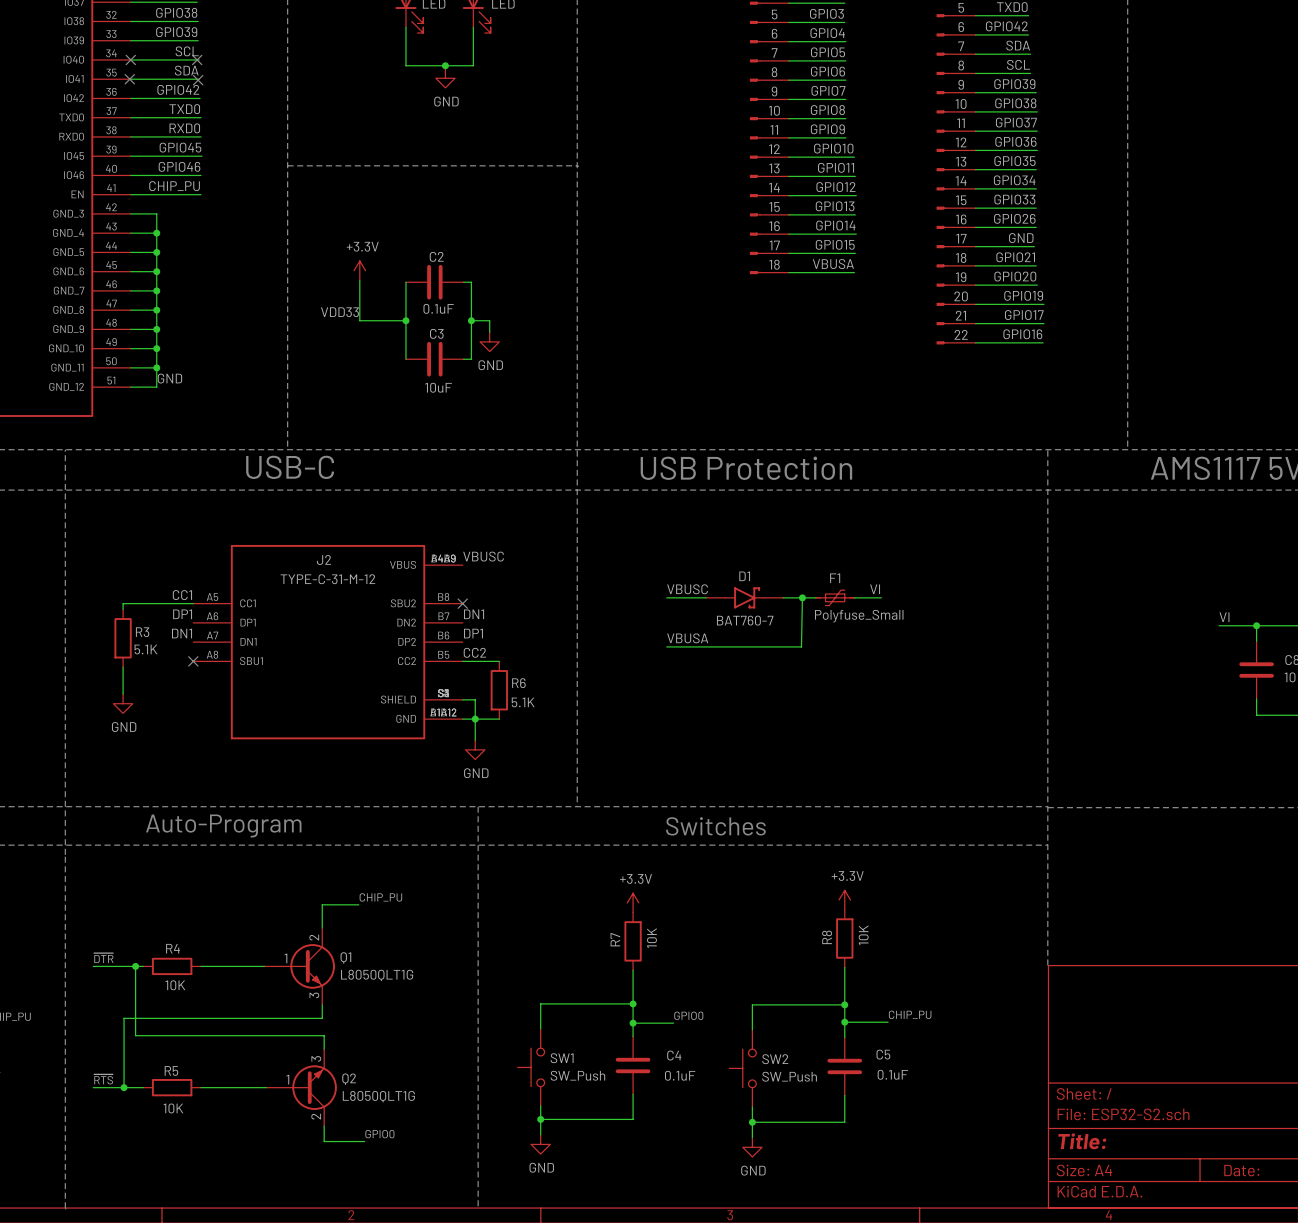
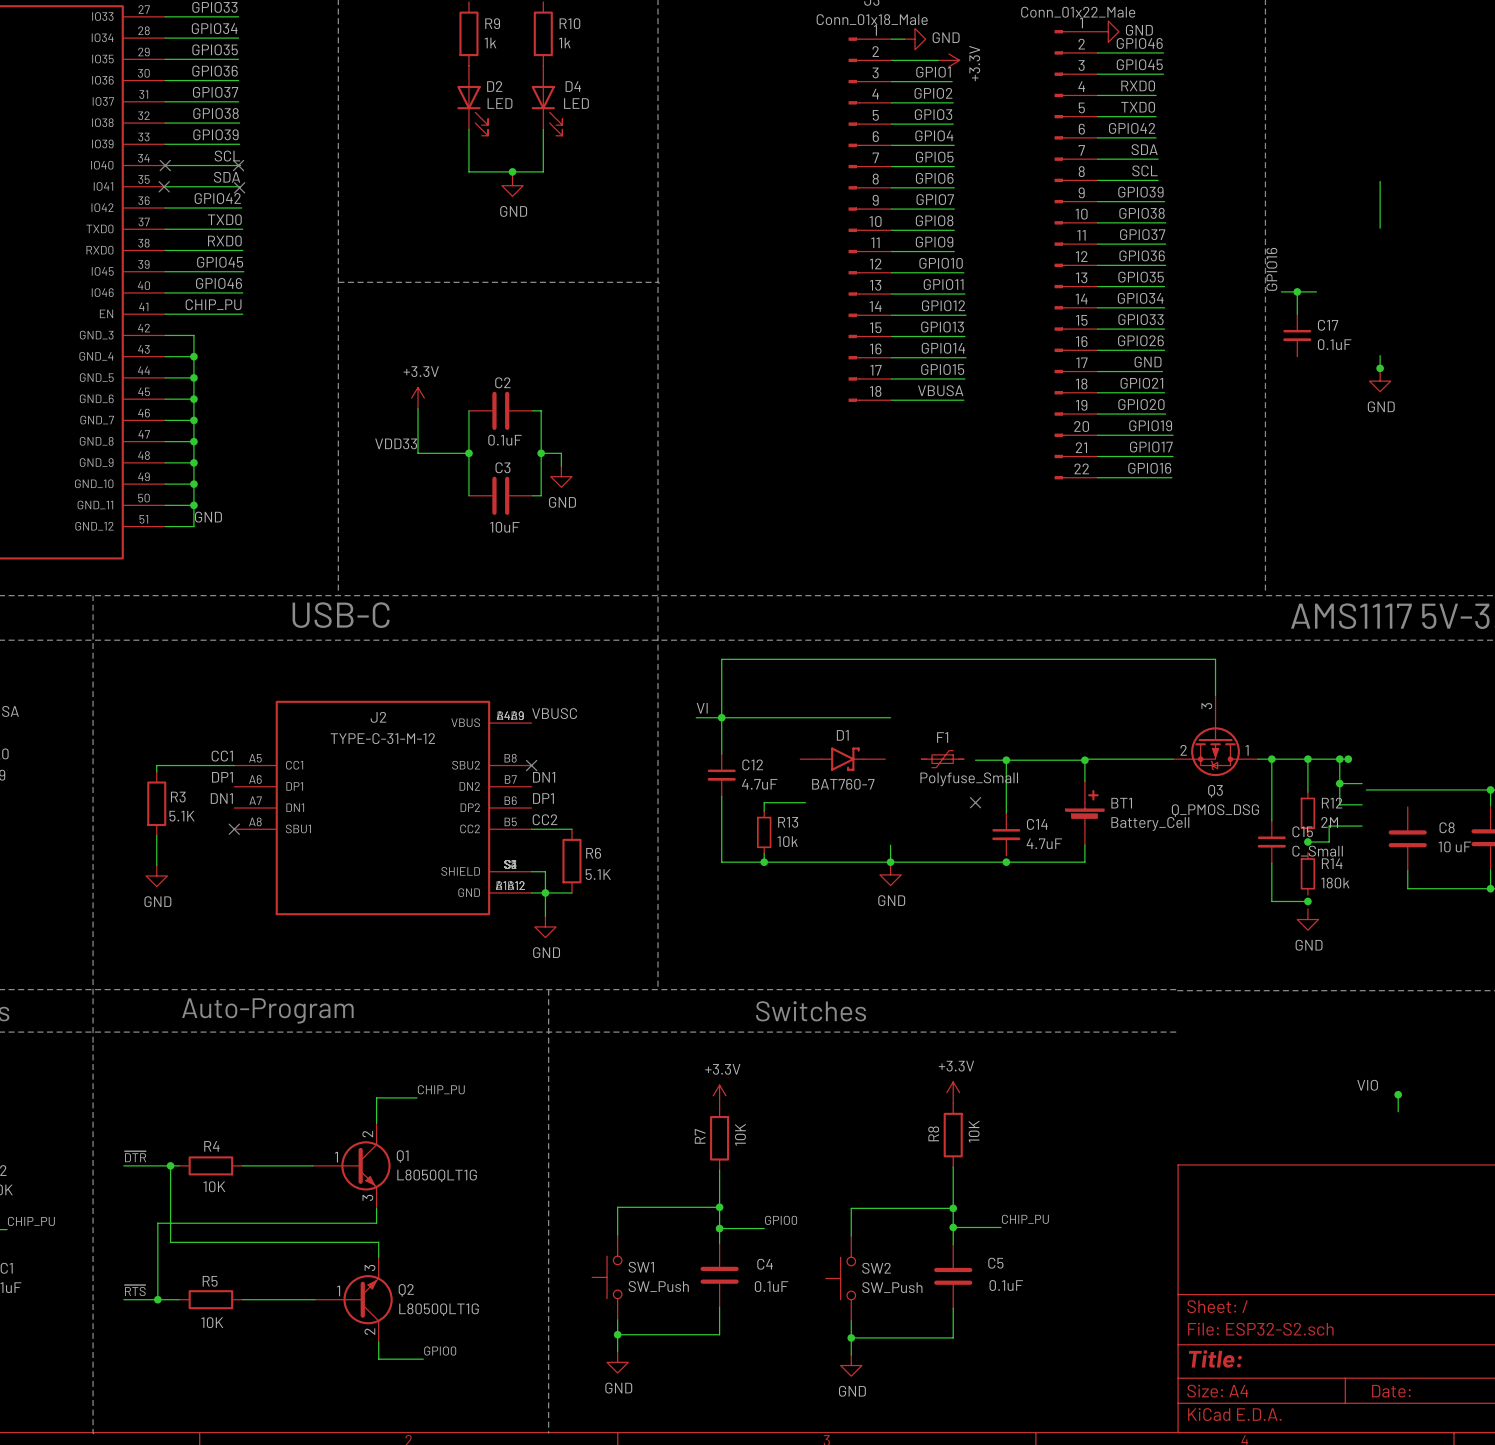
wire: none -> (1380, 181) (1380, 228)
label: none -> GPIO16 (1271, 269)
wire: none -> (1281, 291) (1316, 291)
wire: none -> (1297, 291) (1297, 314)
junction: none -> (1297, 291)
C17: none -> 0.1uF (1297, 335)
wire: none -> (1380, 355) (1380, 370)
junction: none -> (1380, 368)
power symbol: none -> GND (1380, 381)
line: (1047, 450) (1047, 966) -> none
text: USB Protection (746, 468) -> none
wire: none -> (1215, 695) (1215, 659) (721, 659) (721, 716)
label: none -> VI (702, 708)
wire: none -> (696, 717) (890, 717)
wire: none -> (721, 717) (721, 753)
junction: none -> (721, 717)
Q3: none -> Q_PMOS_DSG (1215, 735)
label: VBUSC (687, 589) -> none
label: VI (875, 589) -> none
wire: (666, 597) (706, 597) -> none
wire: (783, 597) (815, 597) -> none
wire: (802, 597) (801, 646) (666, 646) -> none
junction: (802, 597) -> none
wire: (854, 597) (881, 597) -> none
wire: none -> (1173, 759) (1084, 759) (1084, 781)
wire: none -> (1258, 759) (1348, 759)
wire: none -> (1271, 759) (1271, 820)
junction: none -> (1271, 759)
wire: none -> (1307, 759) (1307, 792)
junction: none -> (1307, 759)
wire: none -> (1339, 759) (1339, 804) (1362, 804)
junction: none -> (1339, 759)
junction: none -> (1348, 759)
wire: none -> (975, 760) (1084, 760)
wire: none -> (1006, 760) (1006, 813)
junction: none -> (1006, 760)
junction: none -> (1084, 760)
C12: none -> 4.7uF (721, 775)
label: VI (1224, 617) -> none
wire: none -> (1339, 783) (1362, 783)
junction: none -> (1339, 783)
wire: (1256, 625) (1256, 641) -> none
junction: (1256, 625) -> none
wire: none -> (721, 796) (721, 862) (890, 862)
wire: none -> (805, 802) (764, 802) (764, 811)
no-connect mark: none -> (975, 802)
label: VBUSA (687, 638) -> none
BT1: none -> Battery_Cell (1084, 813)
R12: none -> 2M (1307, 813)
wire: none -> (1362, 826) (1329, 826) (1329, 841) (1307, 841)
R13: none -> 10k (764, 832)
C14: none -> 4.7uF (1006, 834)
C15: none -> C_Small (1271, 841)
junction: none -> (1307, 841)
wire: none -> (890, 845) (890, 864)
wire: none -> (1084, 845) (1084, 862) (891, 862)
wire: none -> (764, 853) (764, 862)
junction: none -> (764, 862)
junction: none -> (890, 862)
junction: none -> (1006, 862)
wire: none -> (1271, 863) (1271, 901) (1307, 901)
R14: none -> 180k (1307, 873)
power symbol: none -> GND (890, 874)
junction: none -> (1307, 901)
power symbol: none -> GND (1307, 919)
label: none -> VIO (1367, 1085)
wire: none -> (1398, 1094) (1398, 1111)
junction: none -> (1398, 1094)

